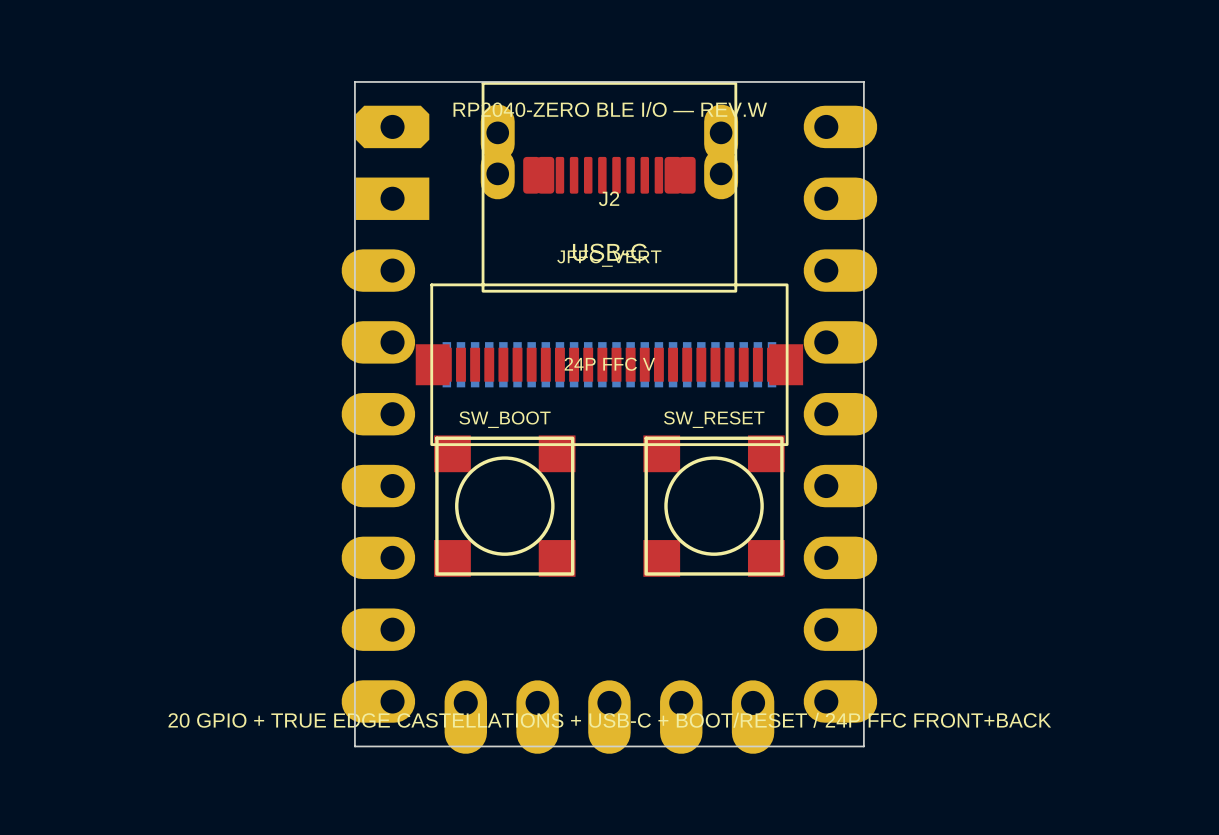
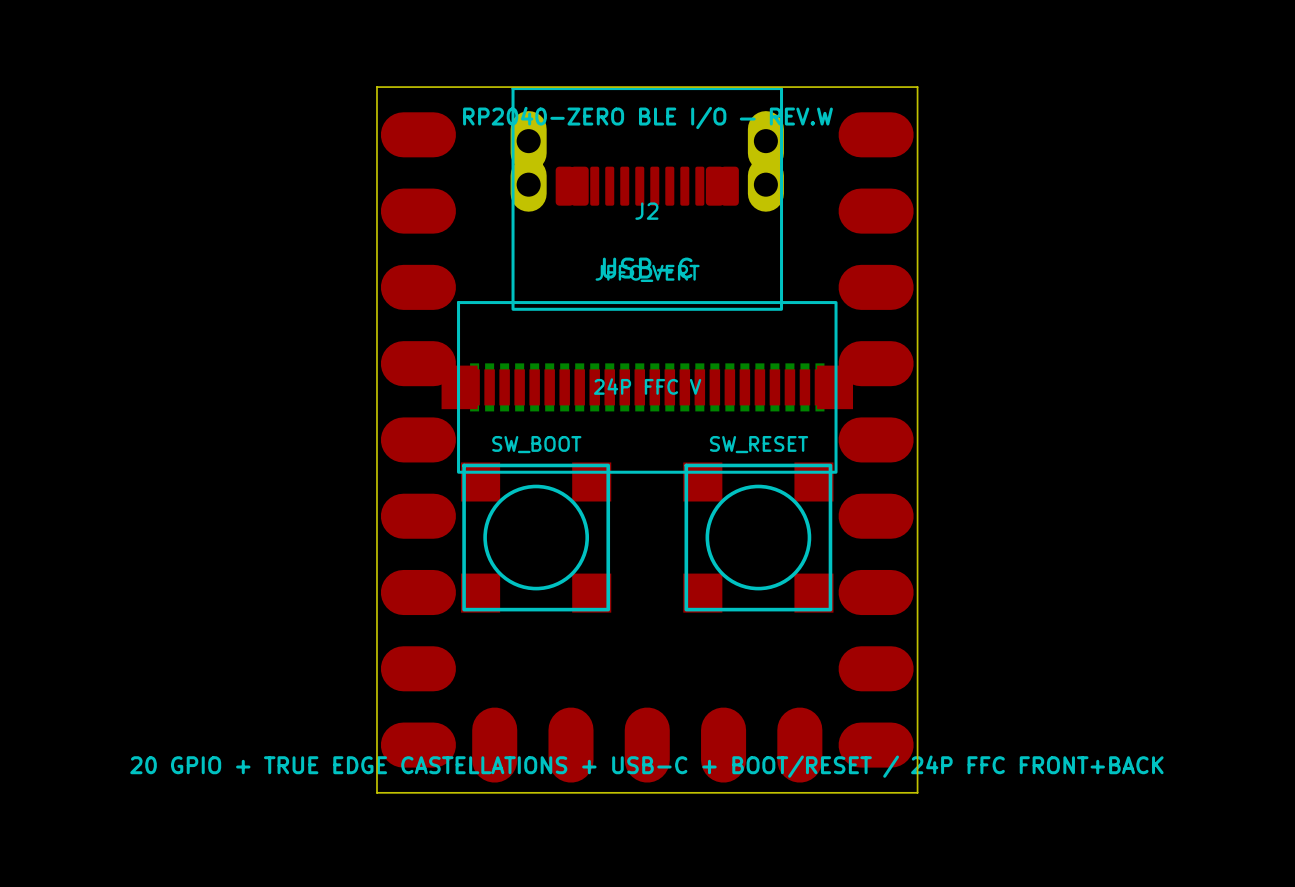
part footprint: [341, 105, 878, 754] -> [380, 112, 914, 783]

